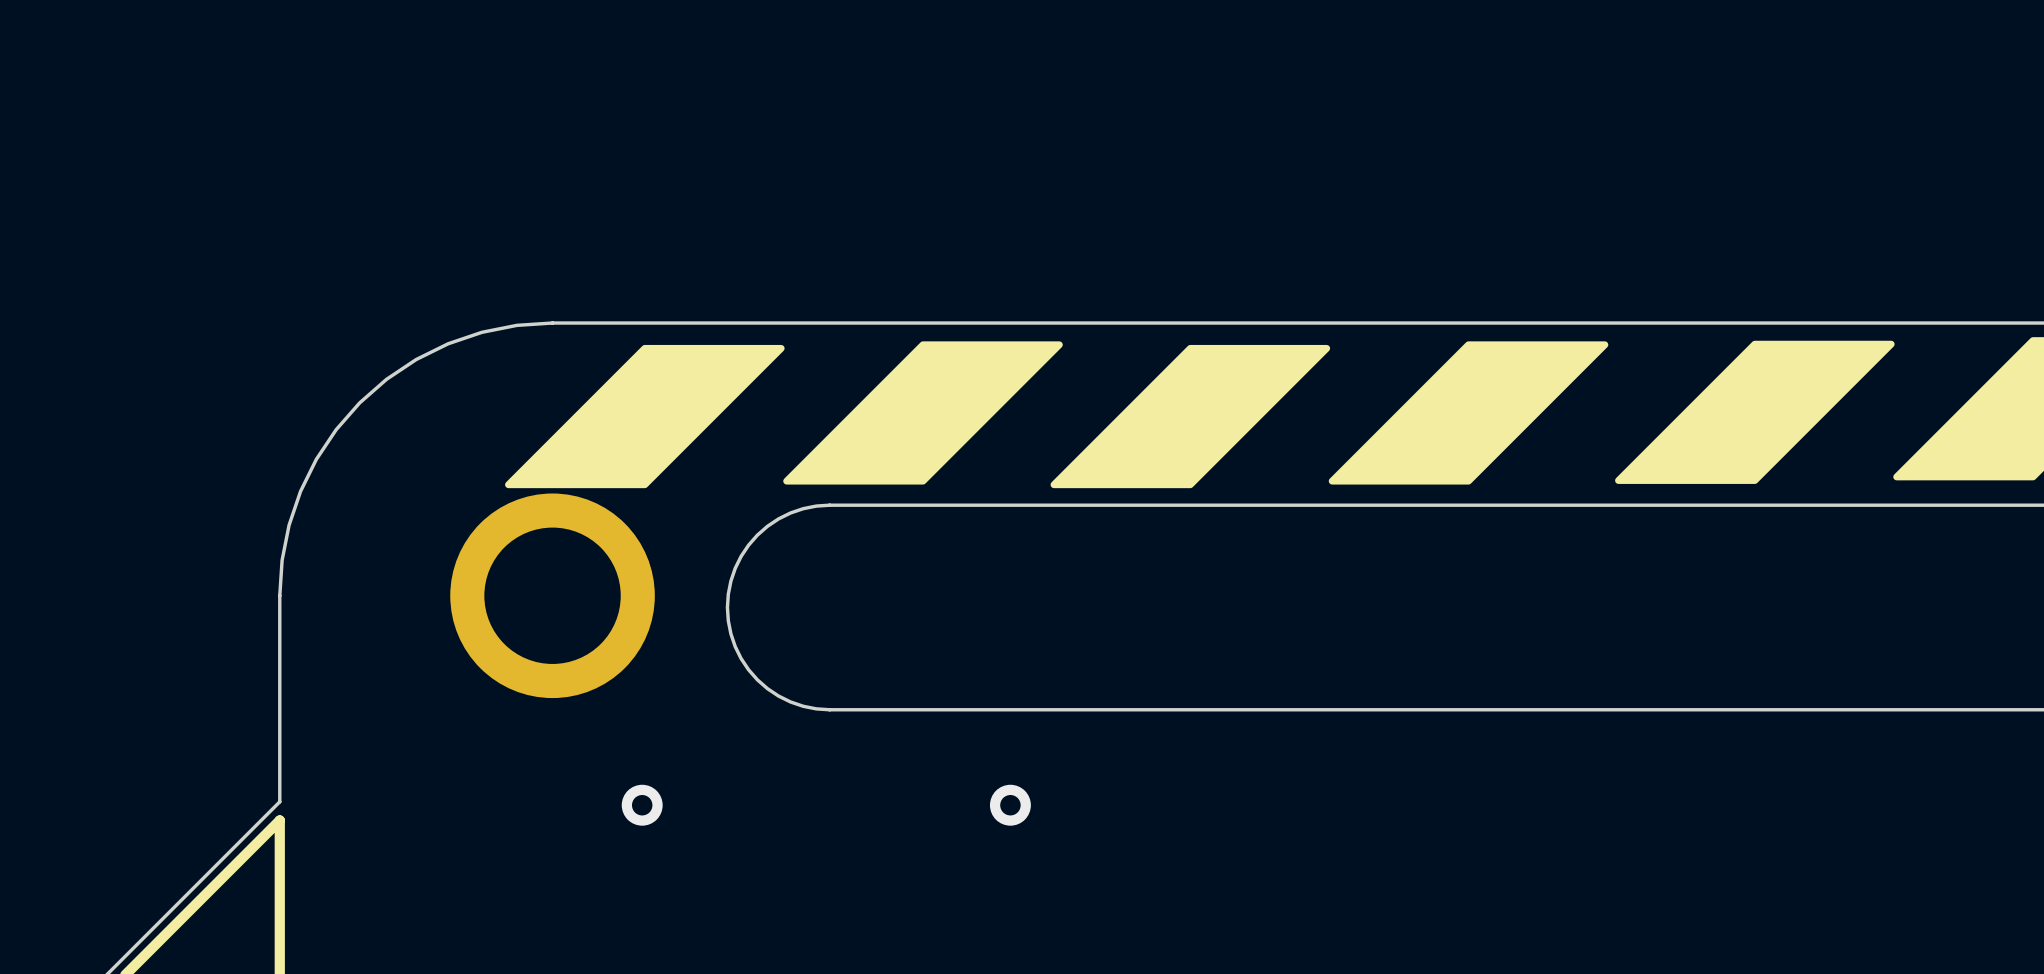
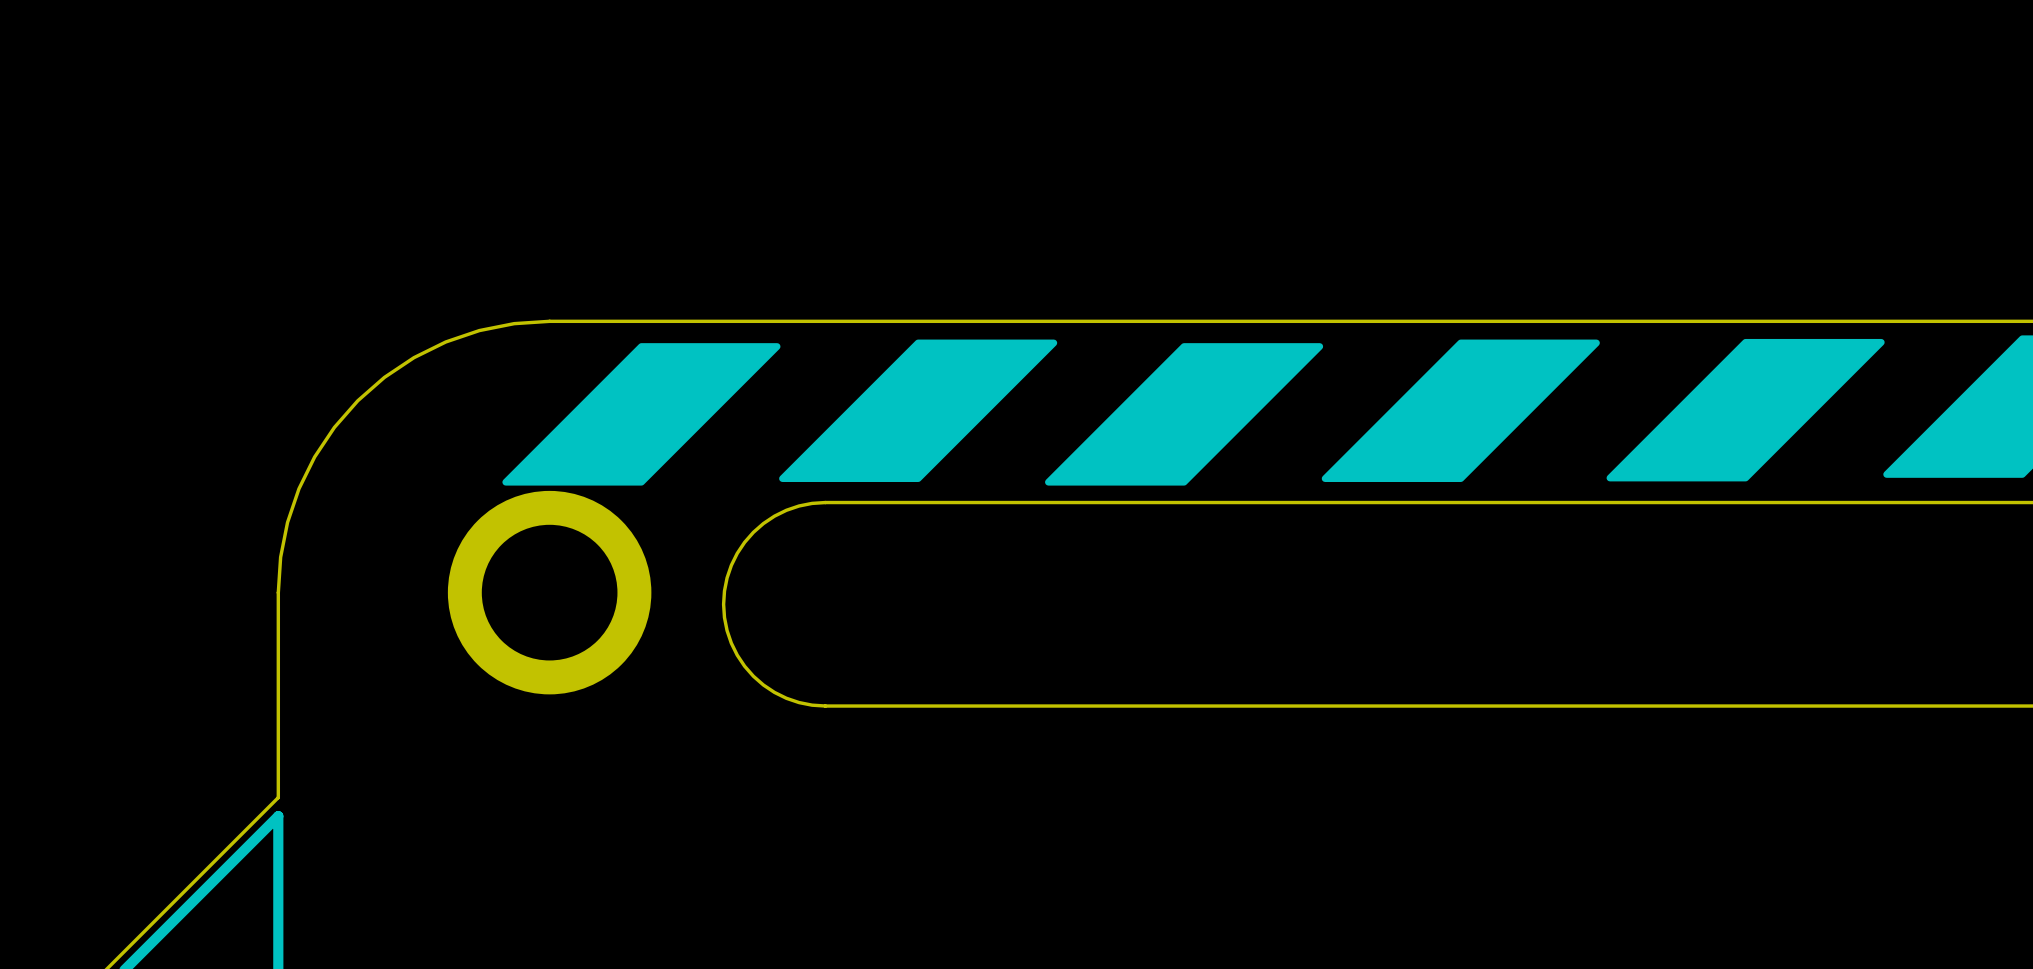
via: (642, 805) -> none
via: (1010, 805) -> none

